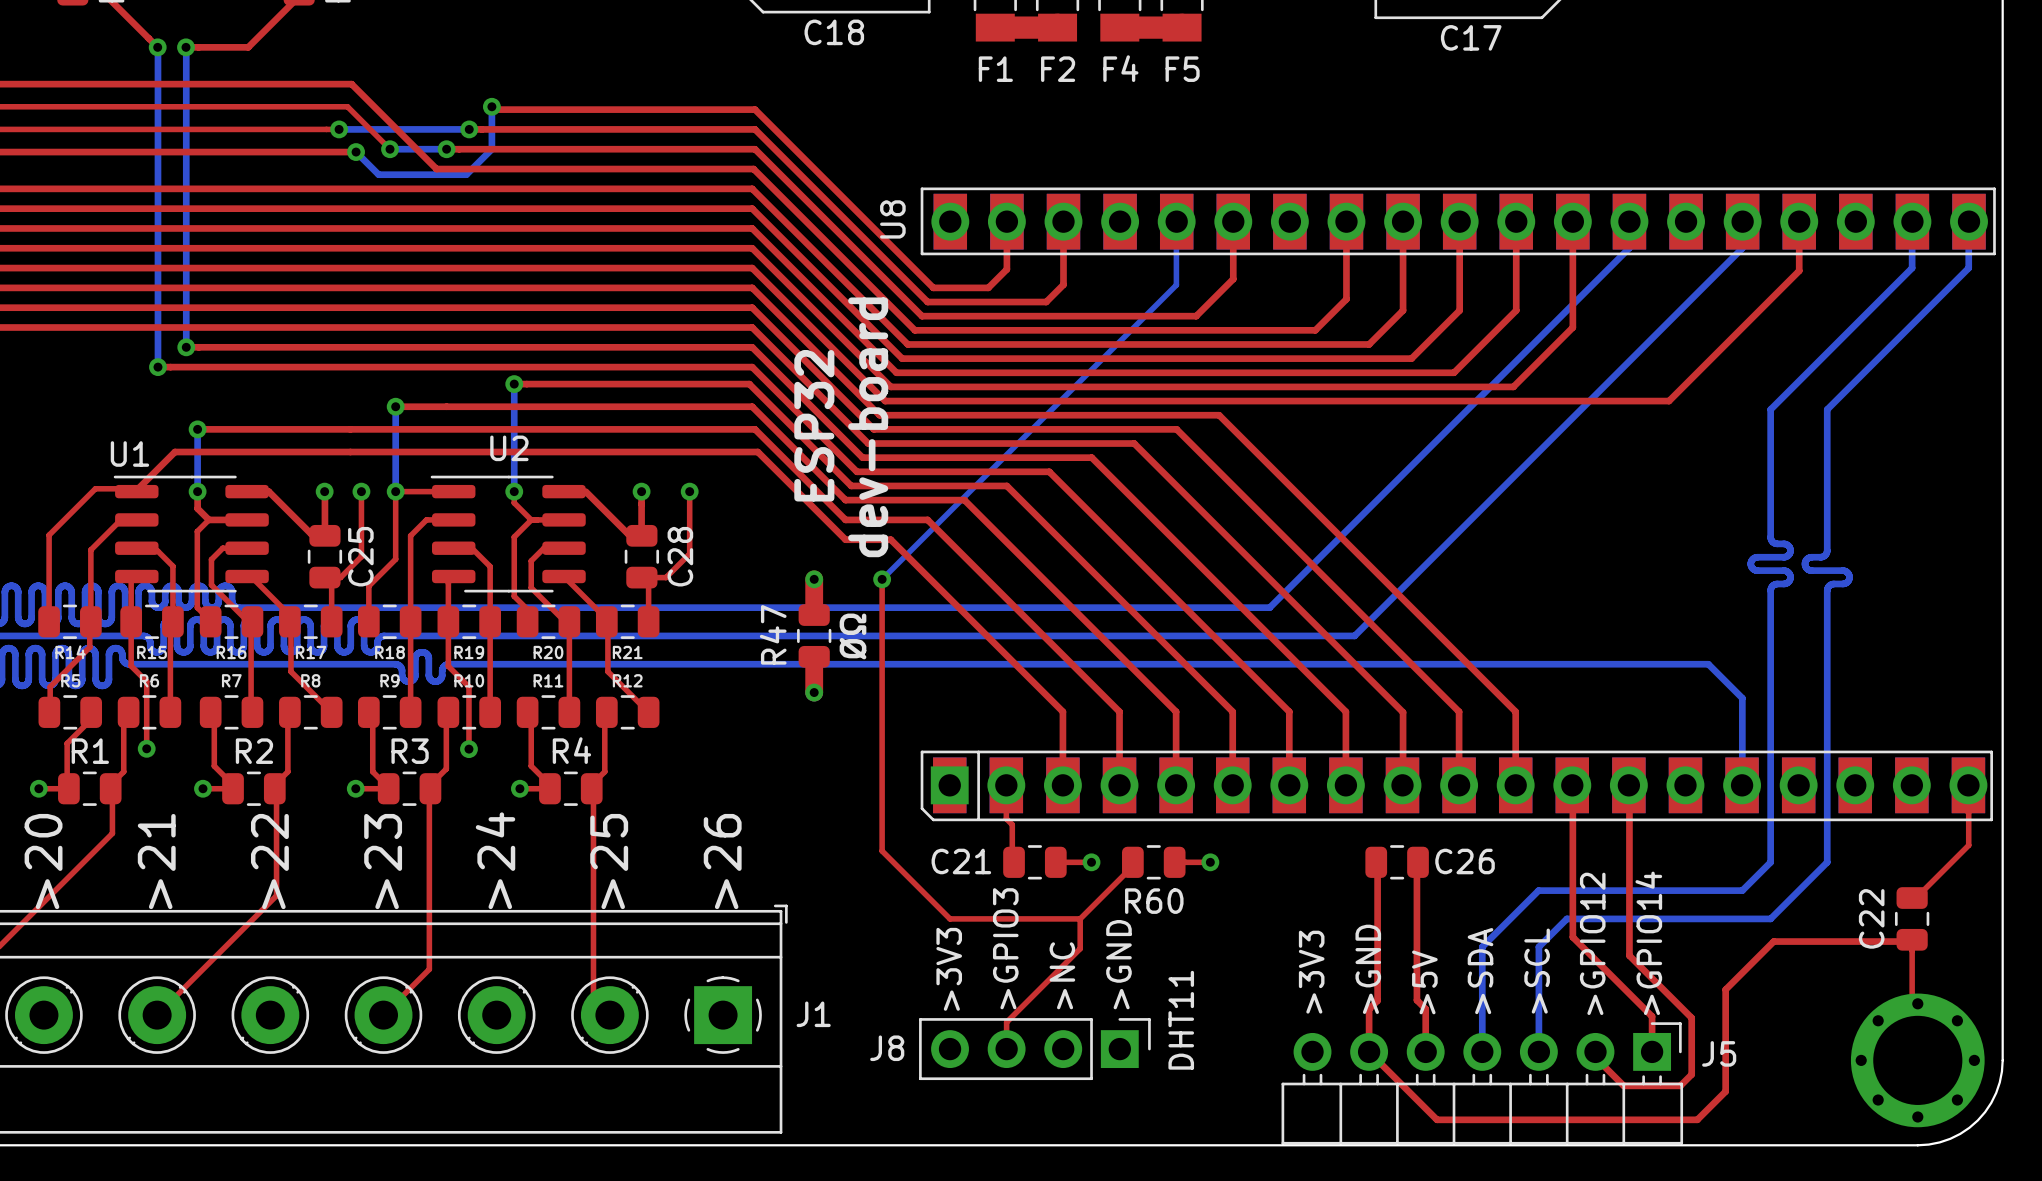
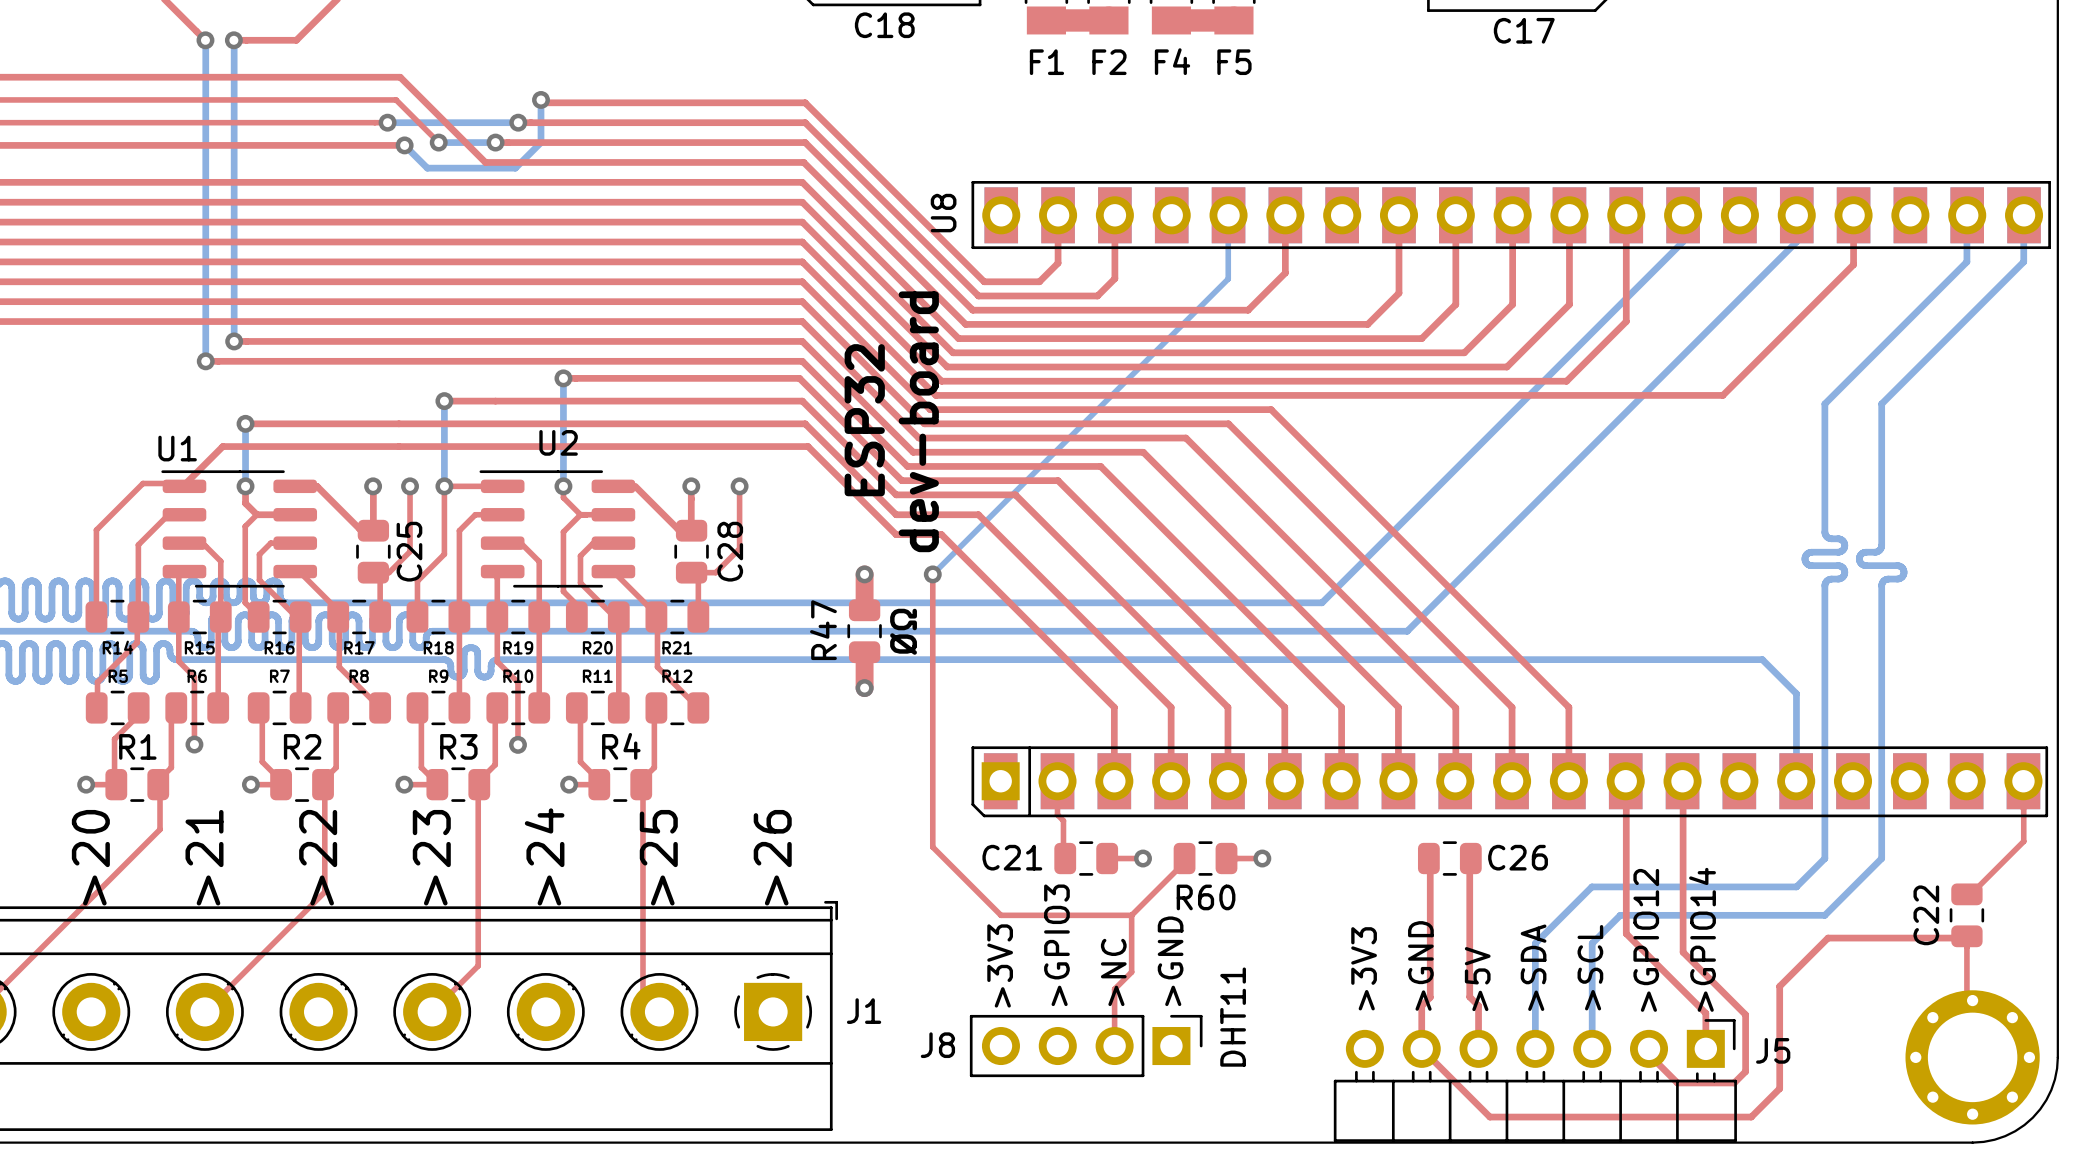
top track: (1080, 948) (1006, 1022) (1006, 1049) -> (1131, 945) (1131, 972) (1114, 989) (1114, 1046)

